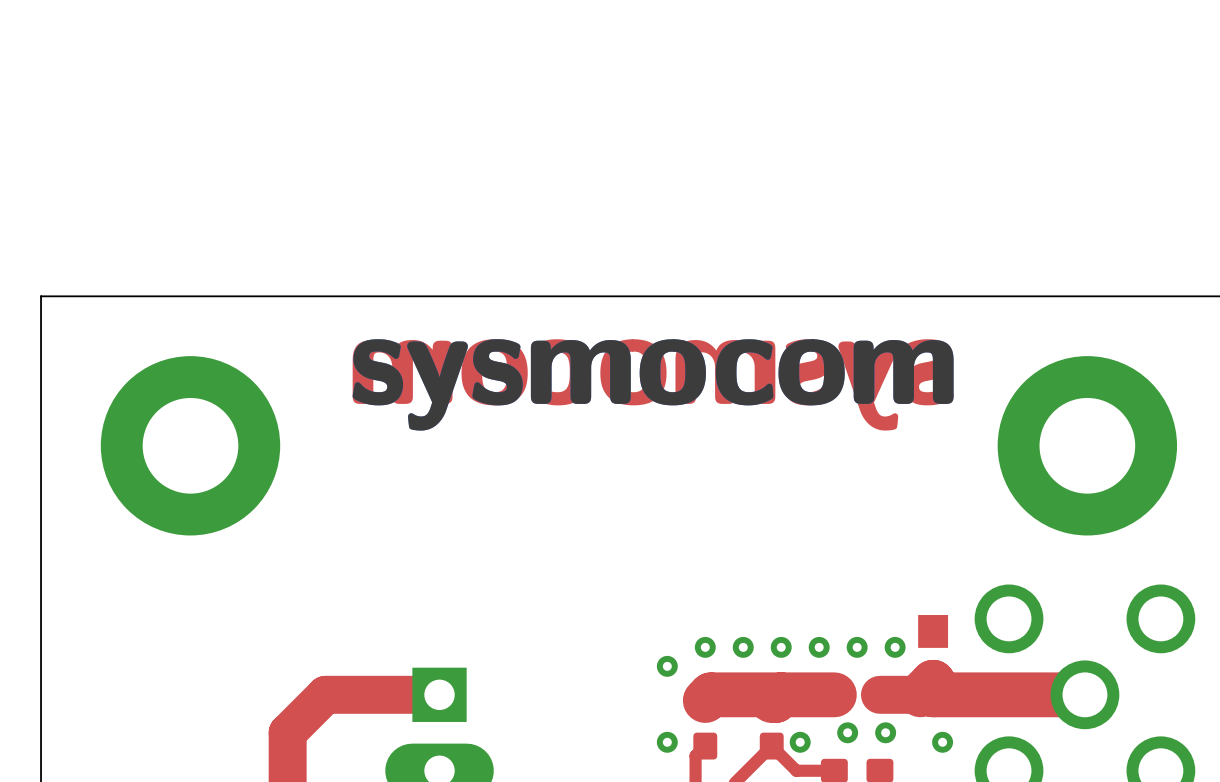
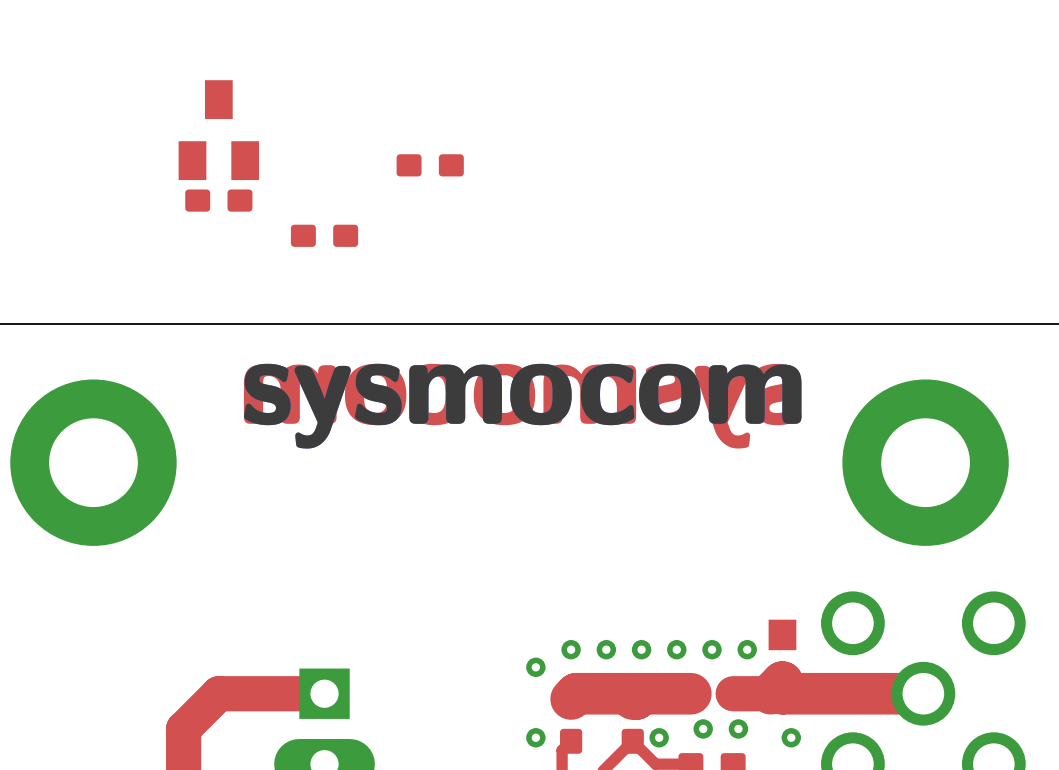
part: none -> (218, 130)
part: none -> (430, 165)
part: none -> (218, 200)
part: none -> (324, 235)

